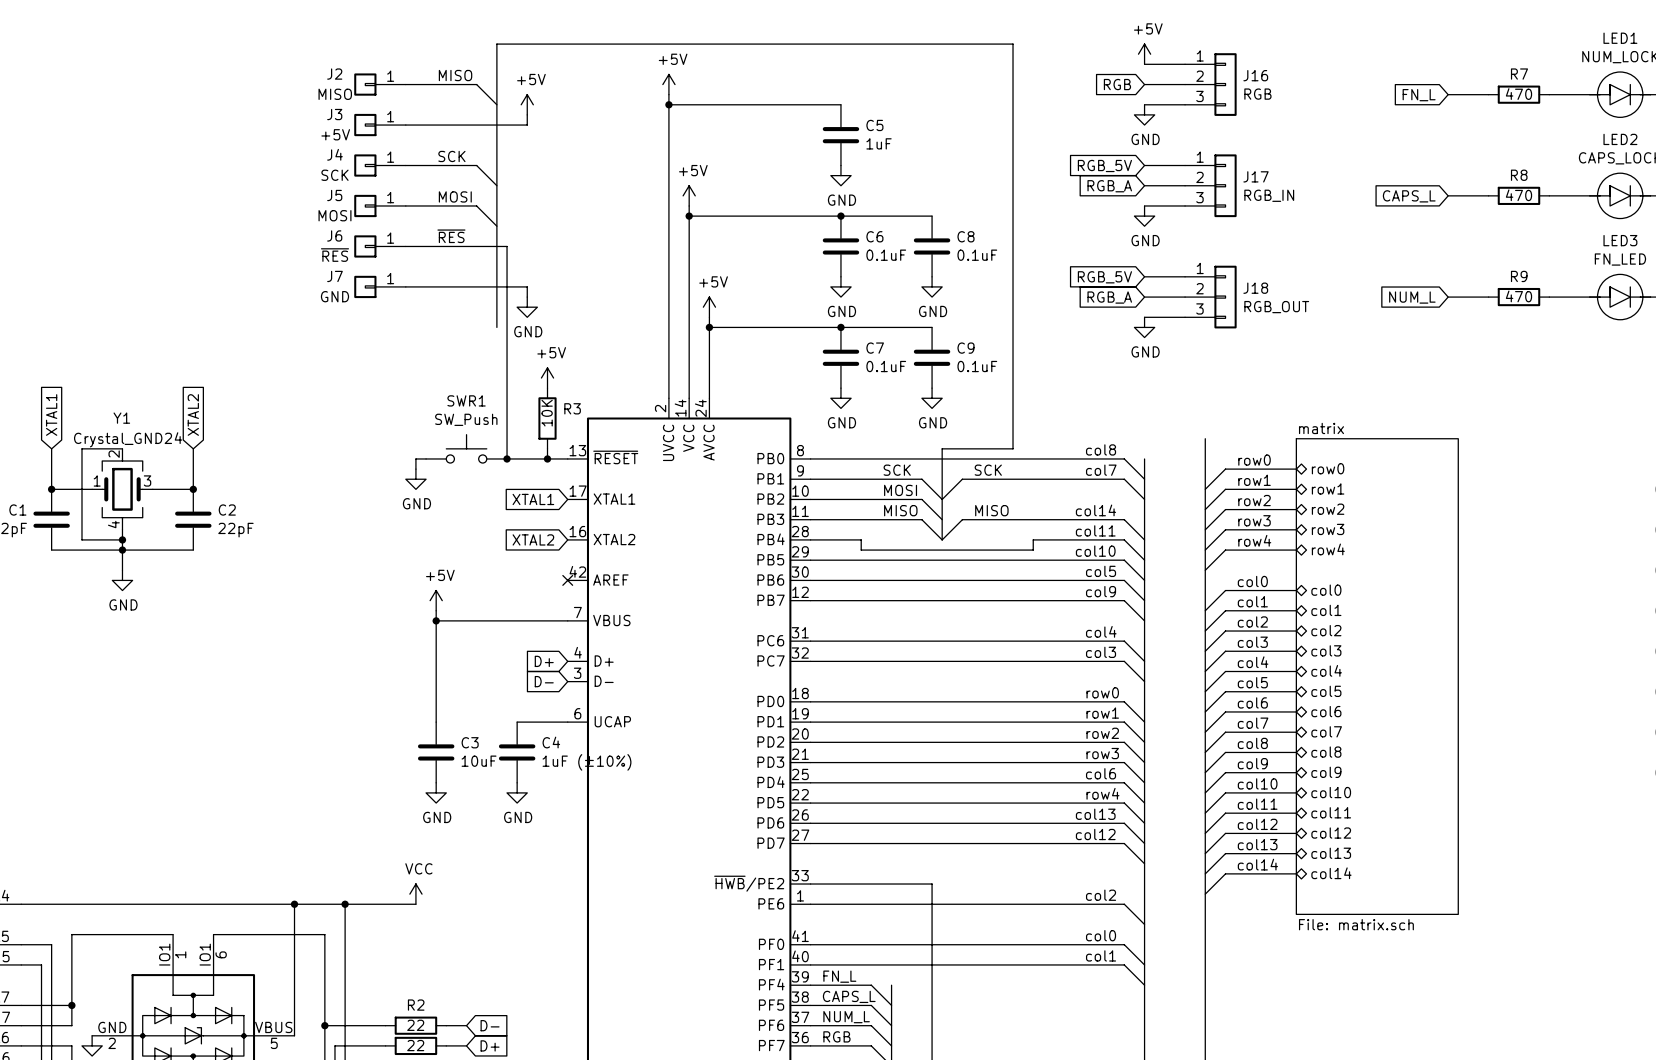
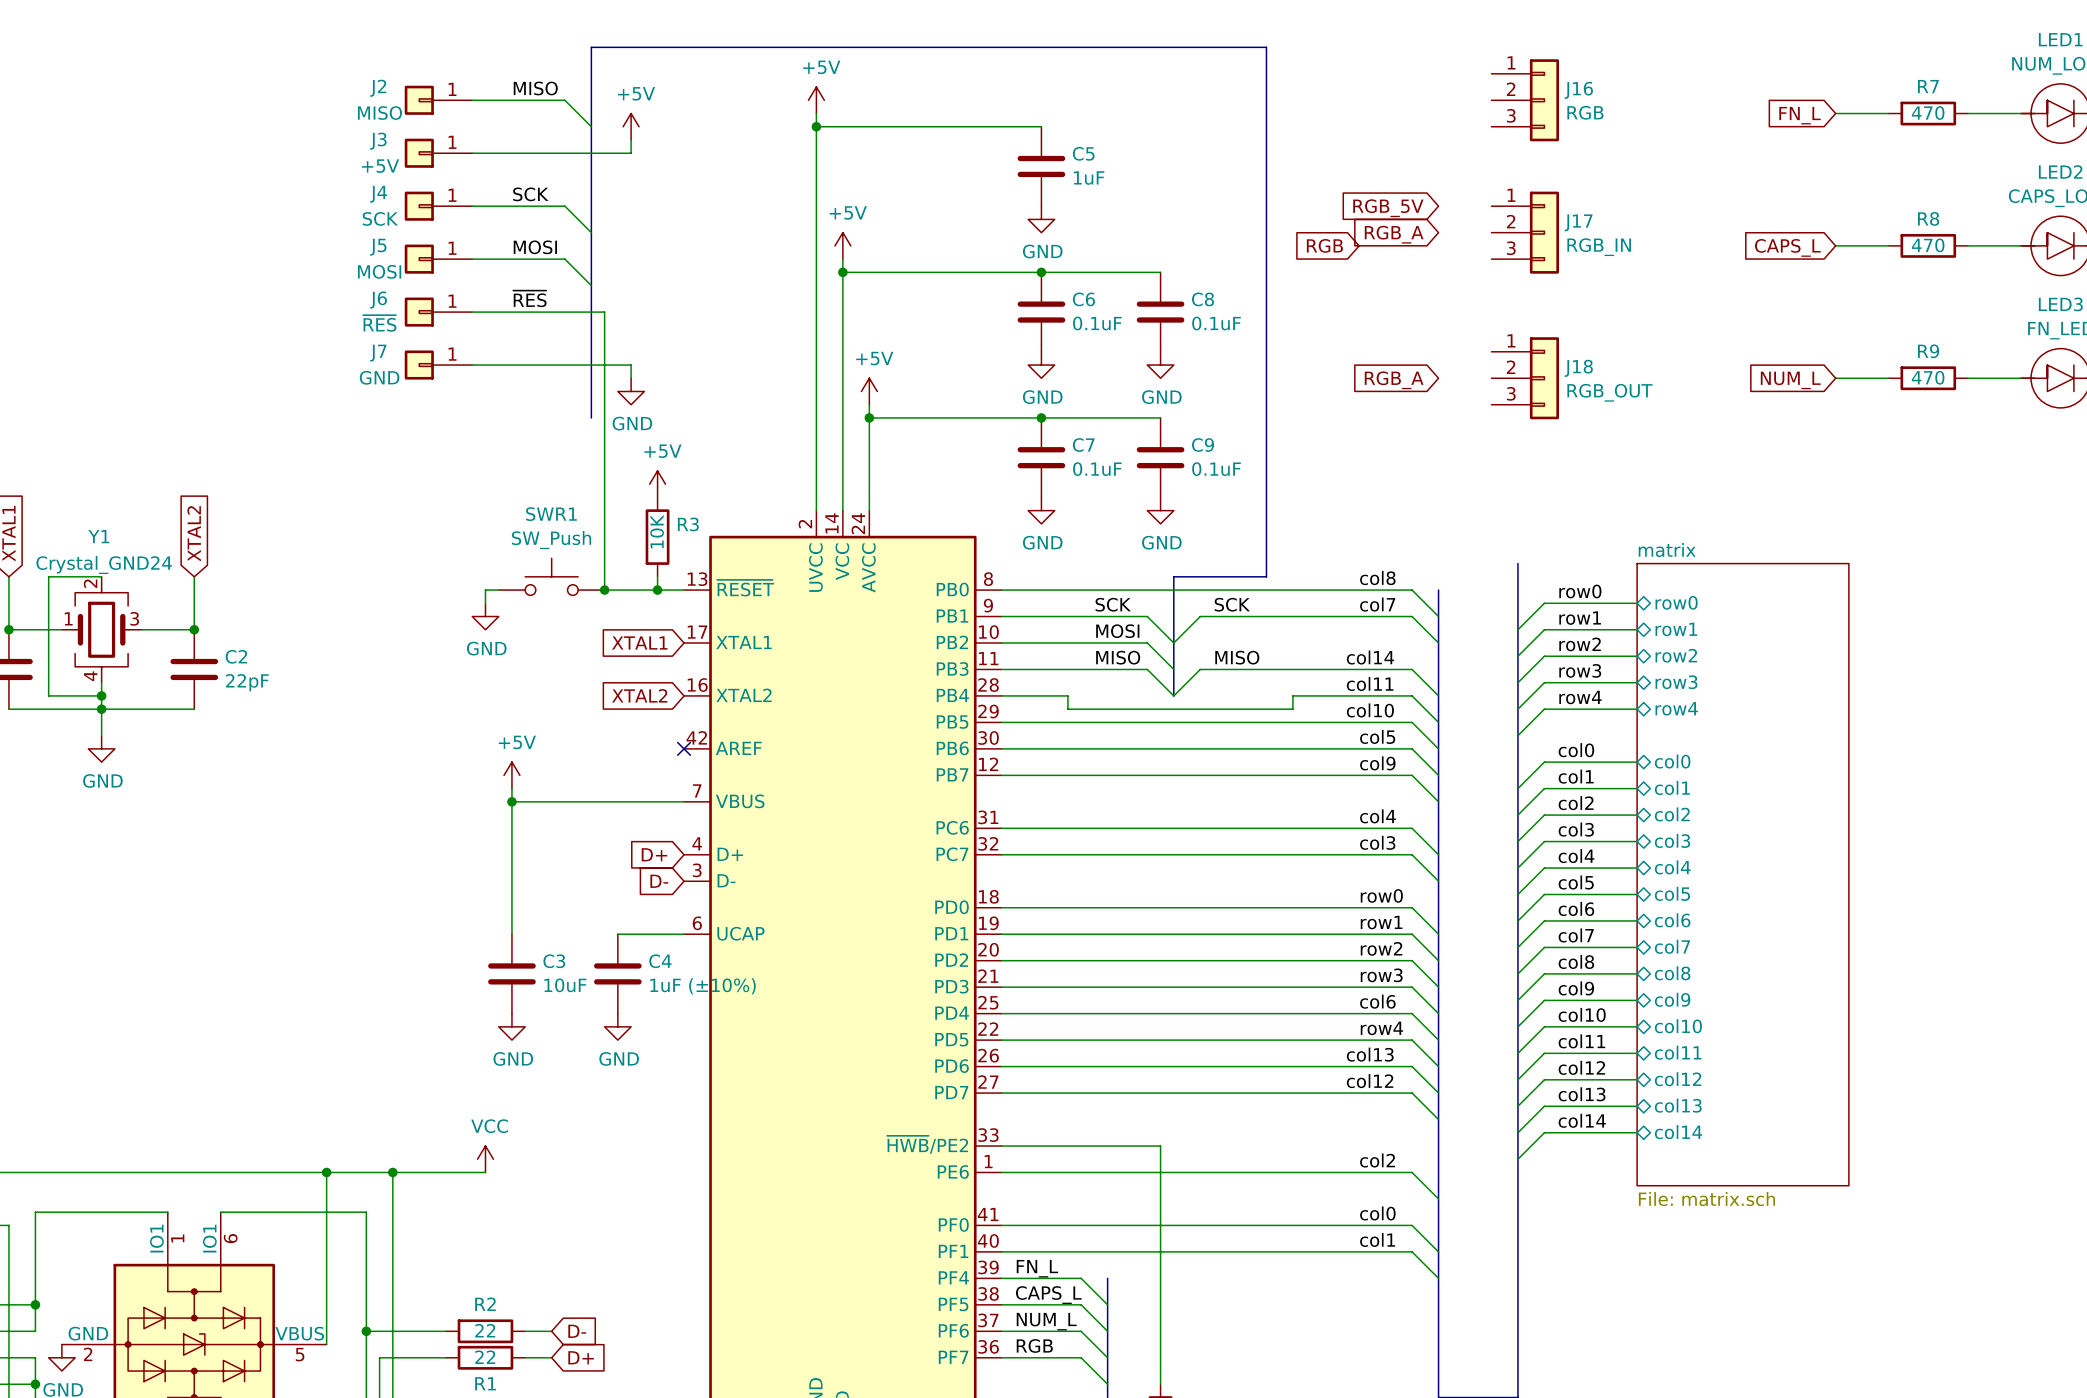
power symbol: +5V (1144, 54) -> none
wire: (1144, 64) (1185, 64) -> none
global label position: RGB (1117, 84) -> RGB (1324, 245)
wire: (1144, 84) (1185, 84) -> none
wire: (1144, 104) (1185, 104) -> none
power symbol: GND (1144, 114) -> none
wire: (1144, 165) (1185, 165) -> none
wire: (1144, 185) (1185, 185) -> none
wire: (1144, 205) (1185, 205) -> none
power symbol: GND (1144, 216) -> none
wire: (1144, 276) (1185, 276) -> none
global label: RGB_5V (1104, 277) -> none
wire: (1144, 297) (1185, 297) -> none
wire: (1144, 317) (1185, 317) -> none
power symbol: GND (1144, 327) -> none

